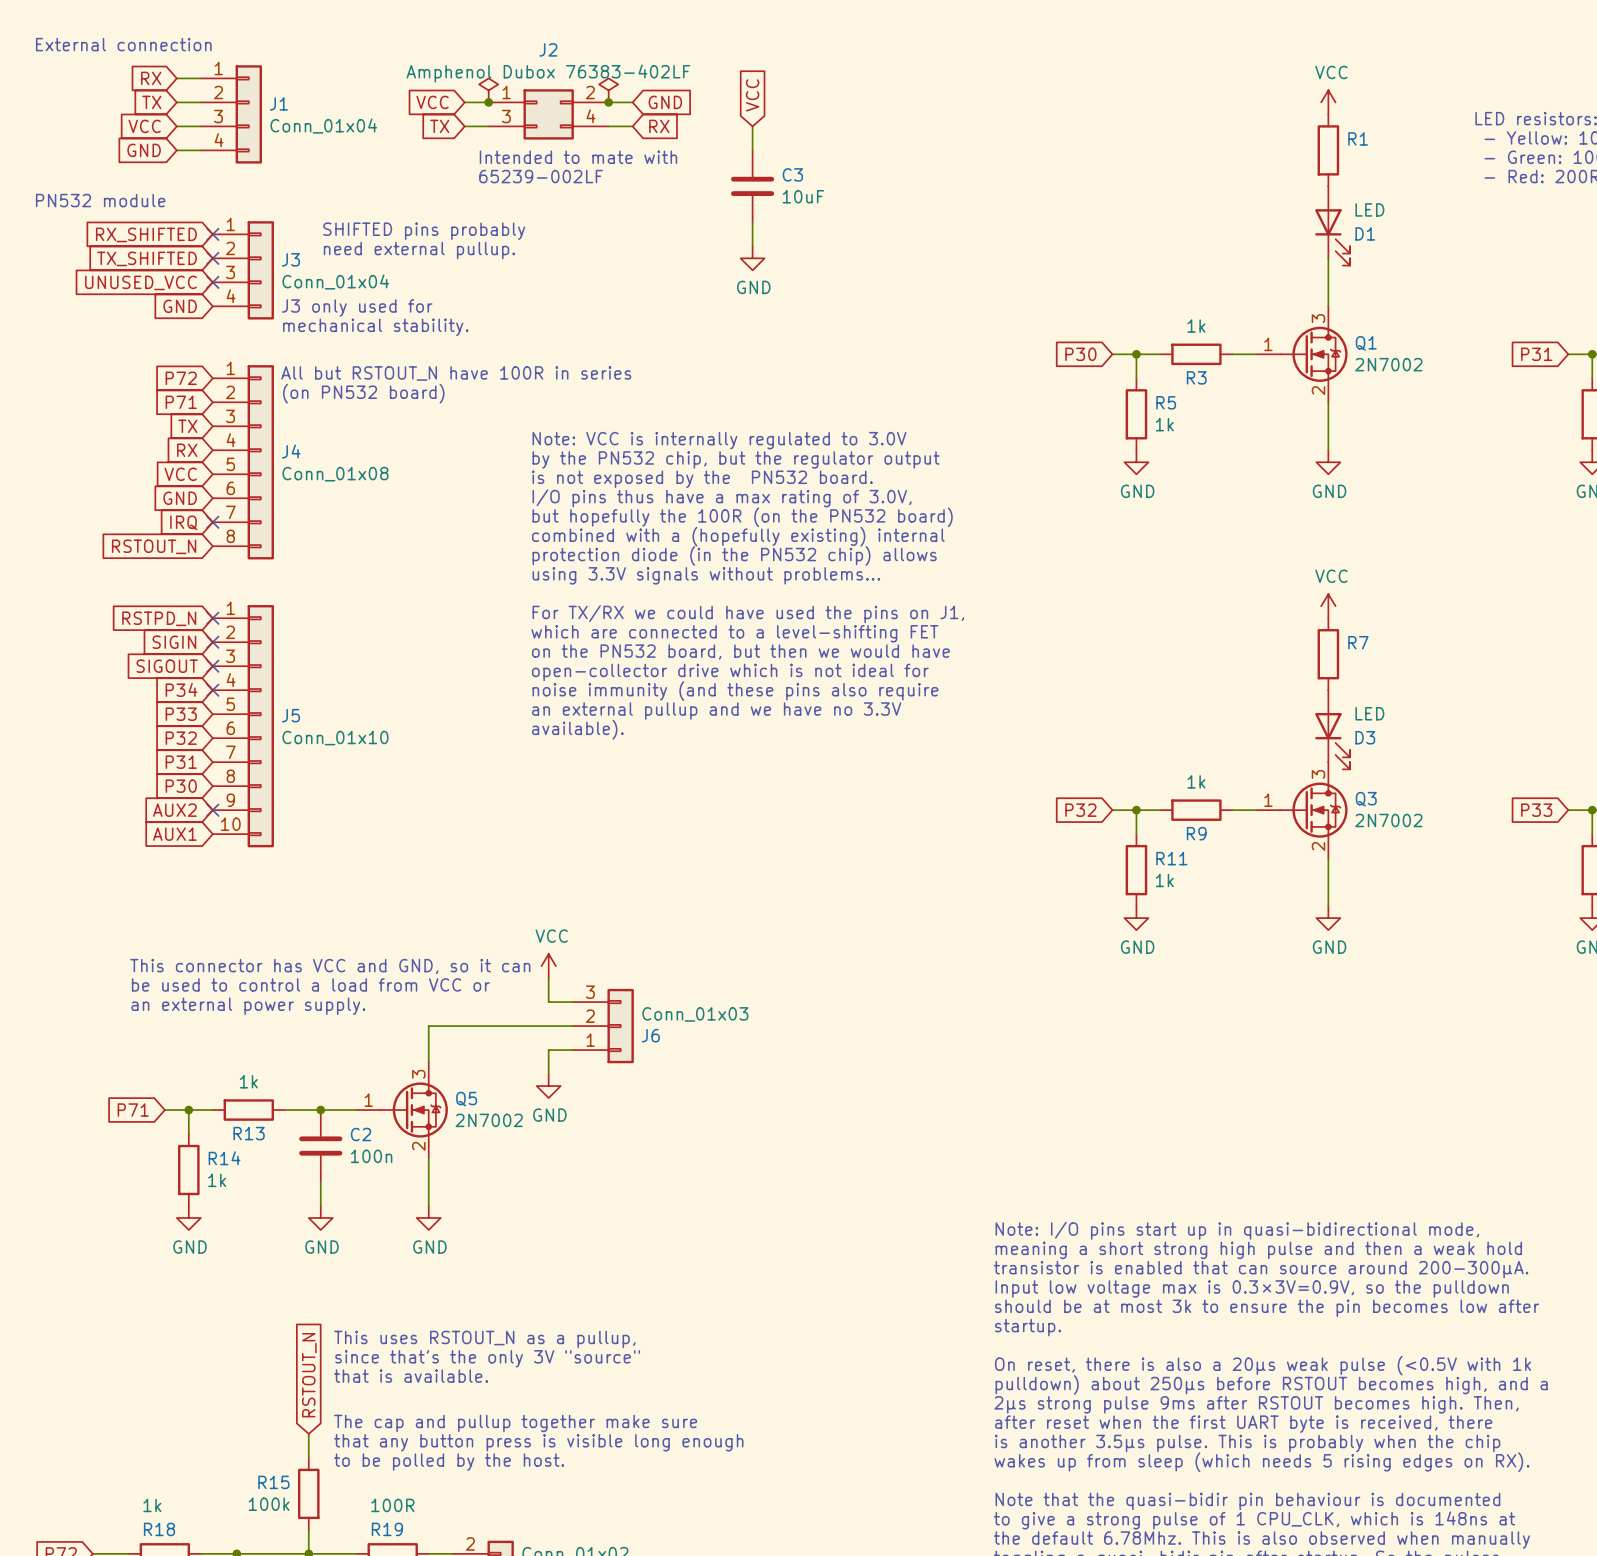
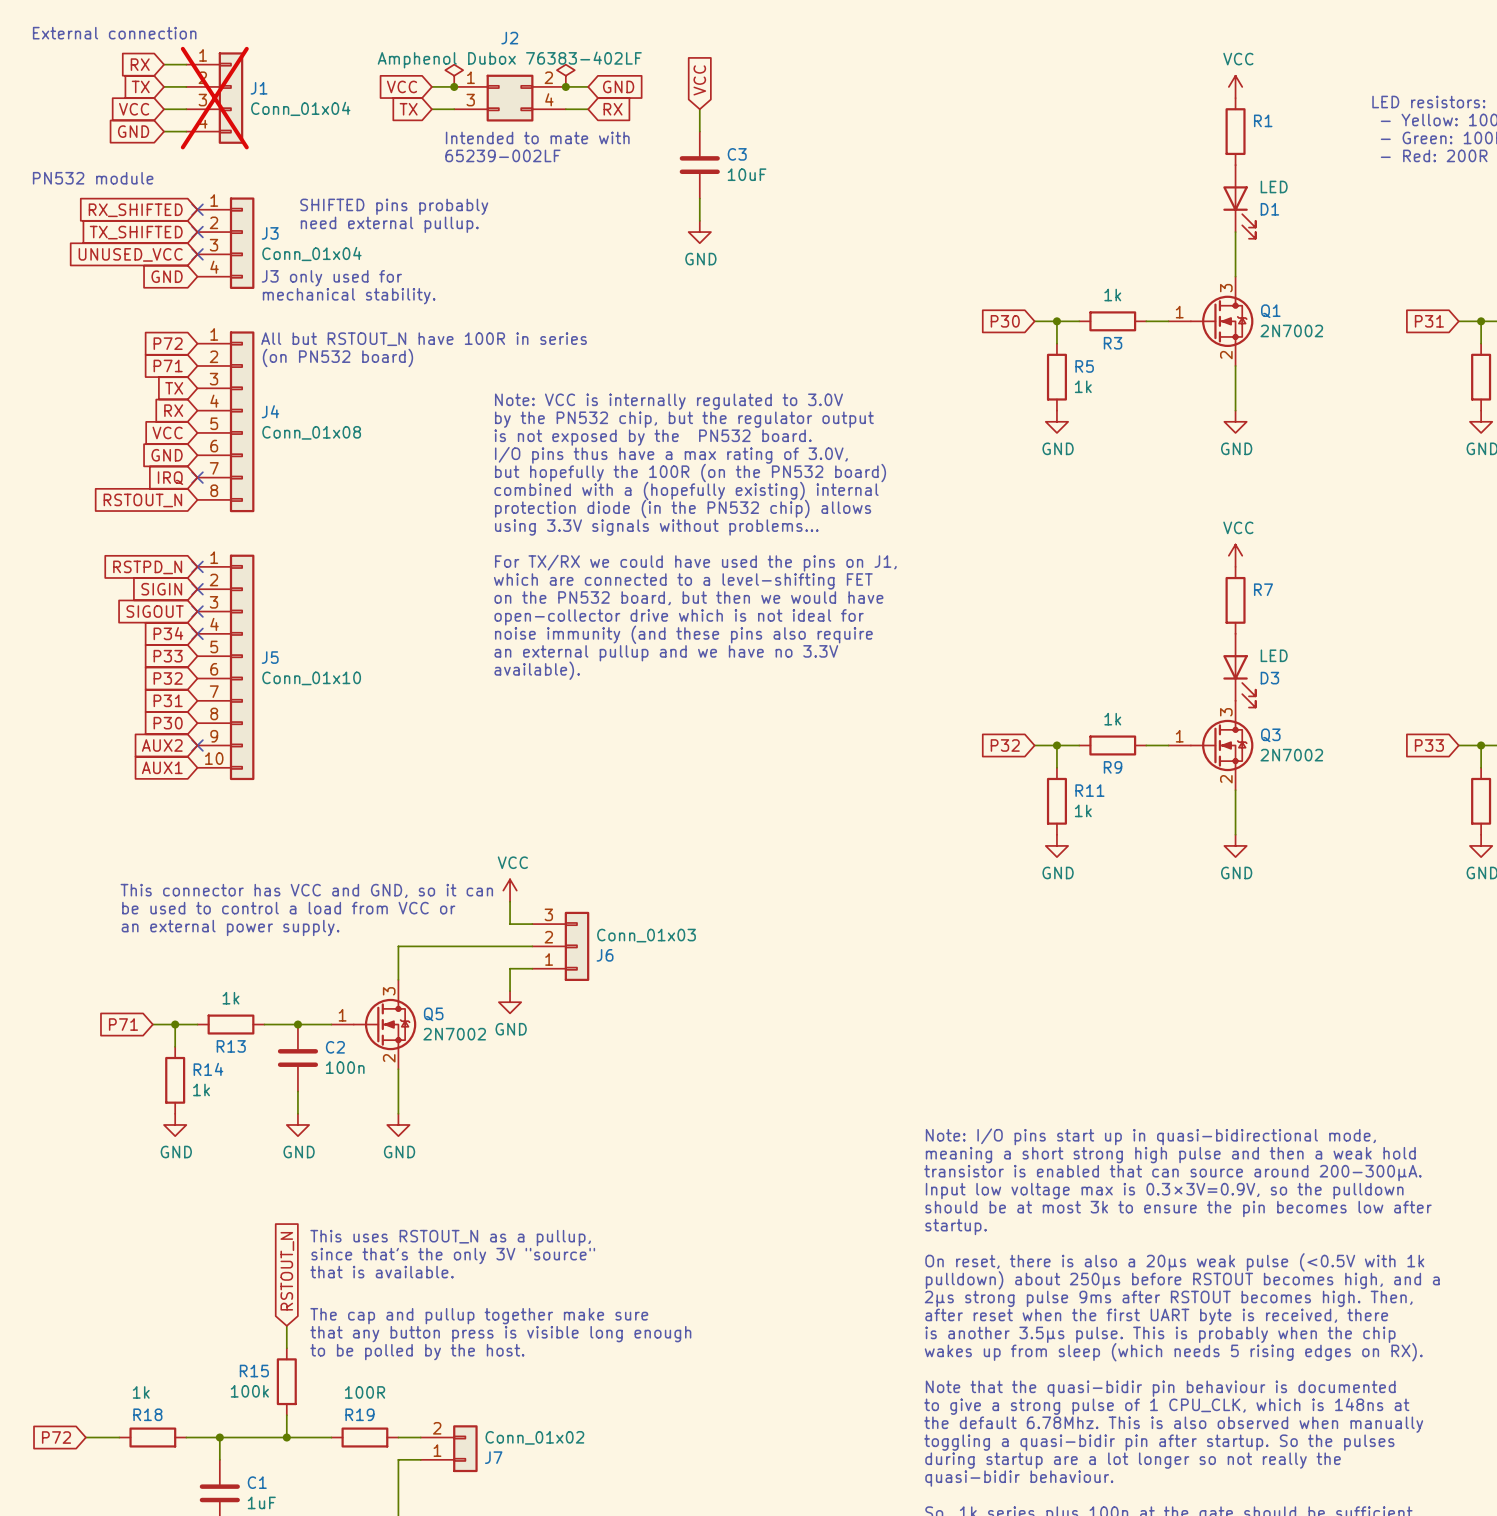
J1 do-not-place cross: none -> (214, 98)

